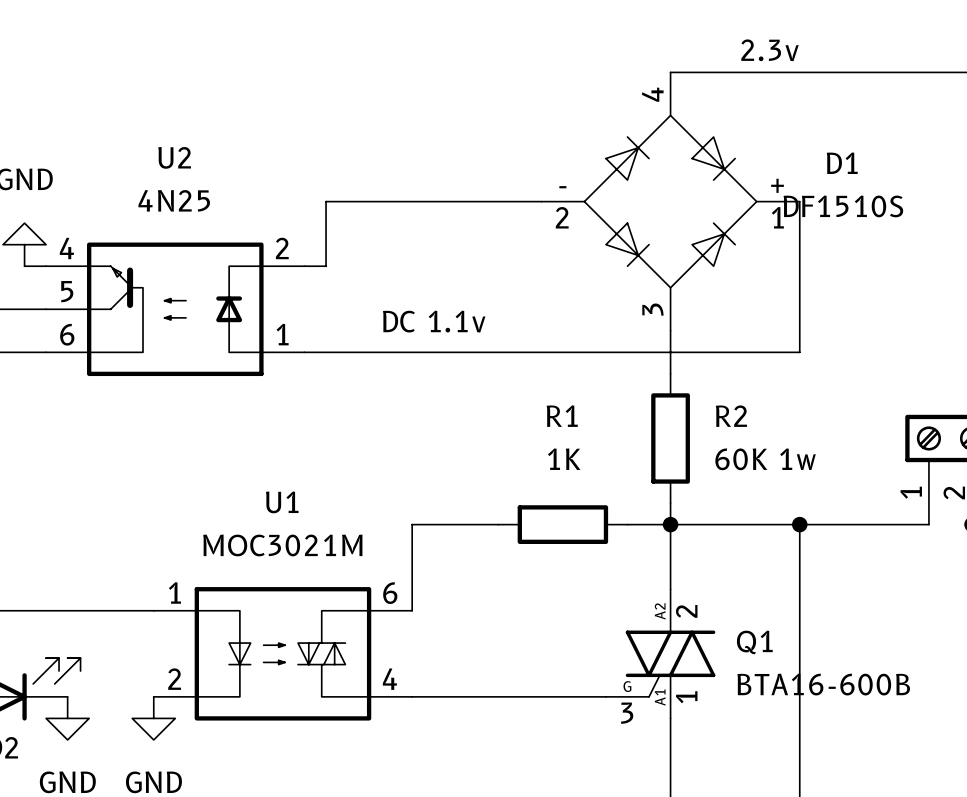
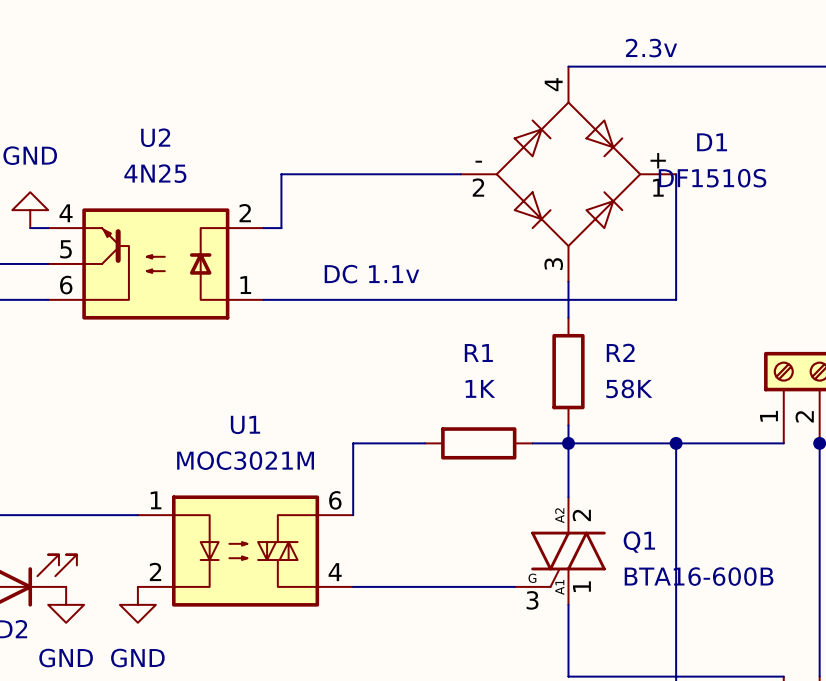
R2 value: 60K 1w (765, 459) -> 58K (629, 388)

